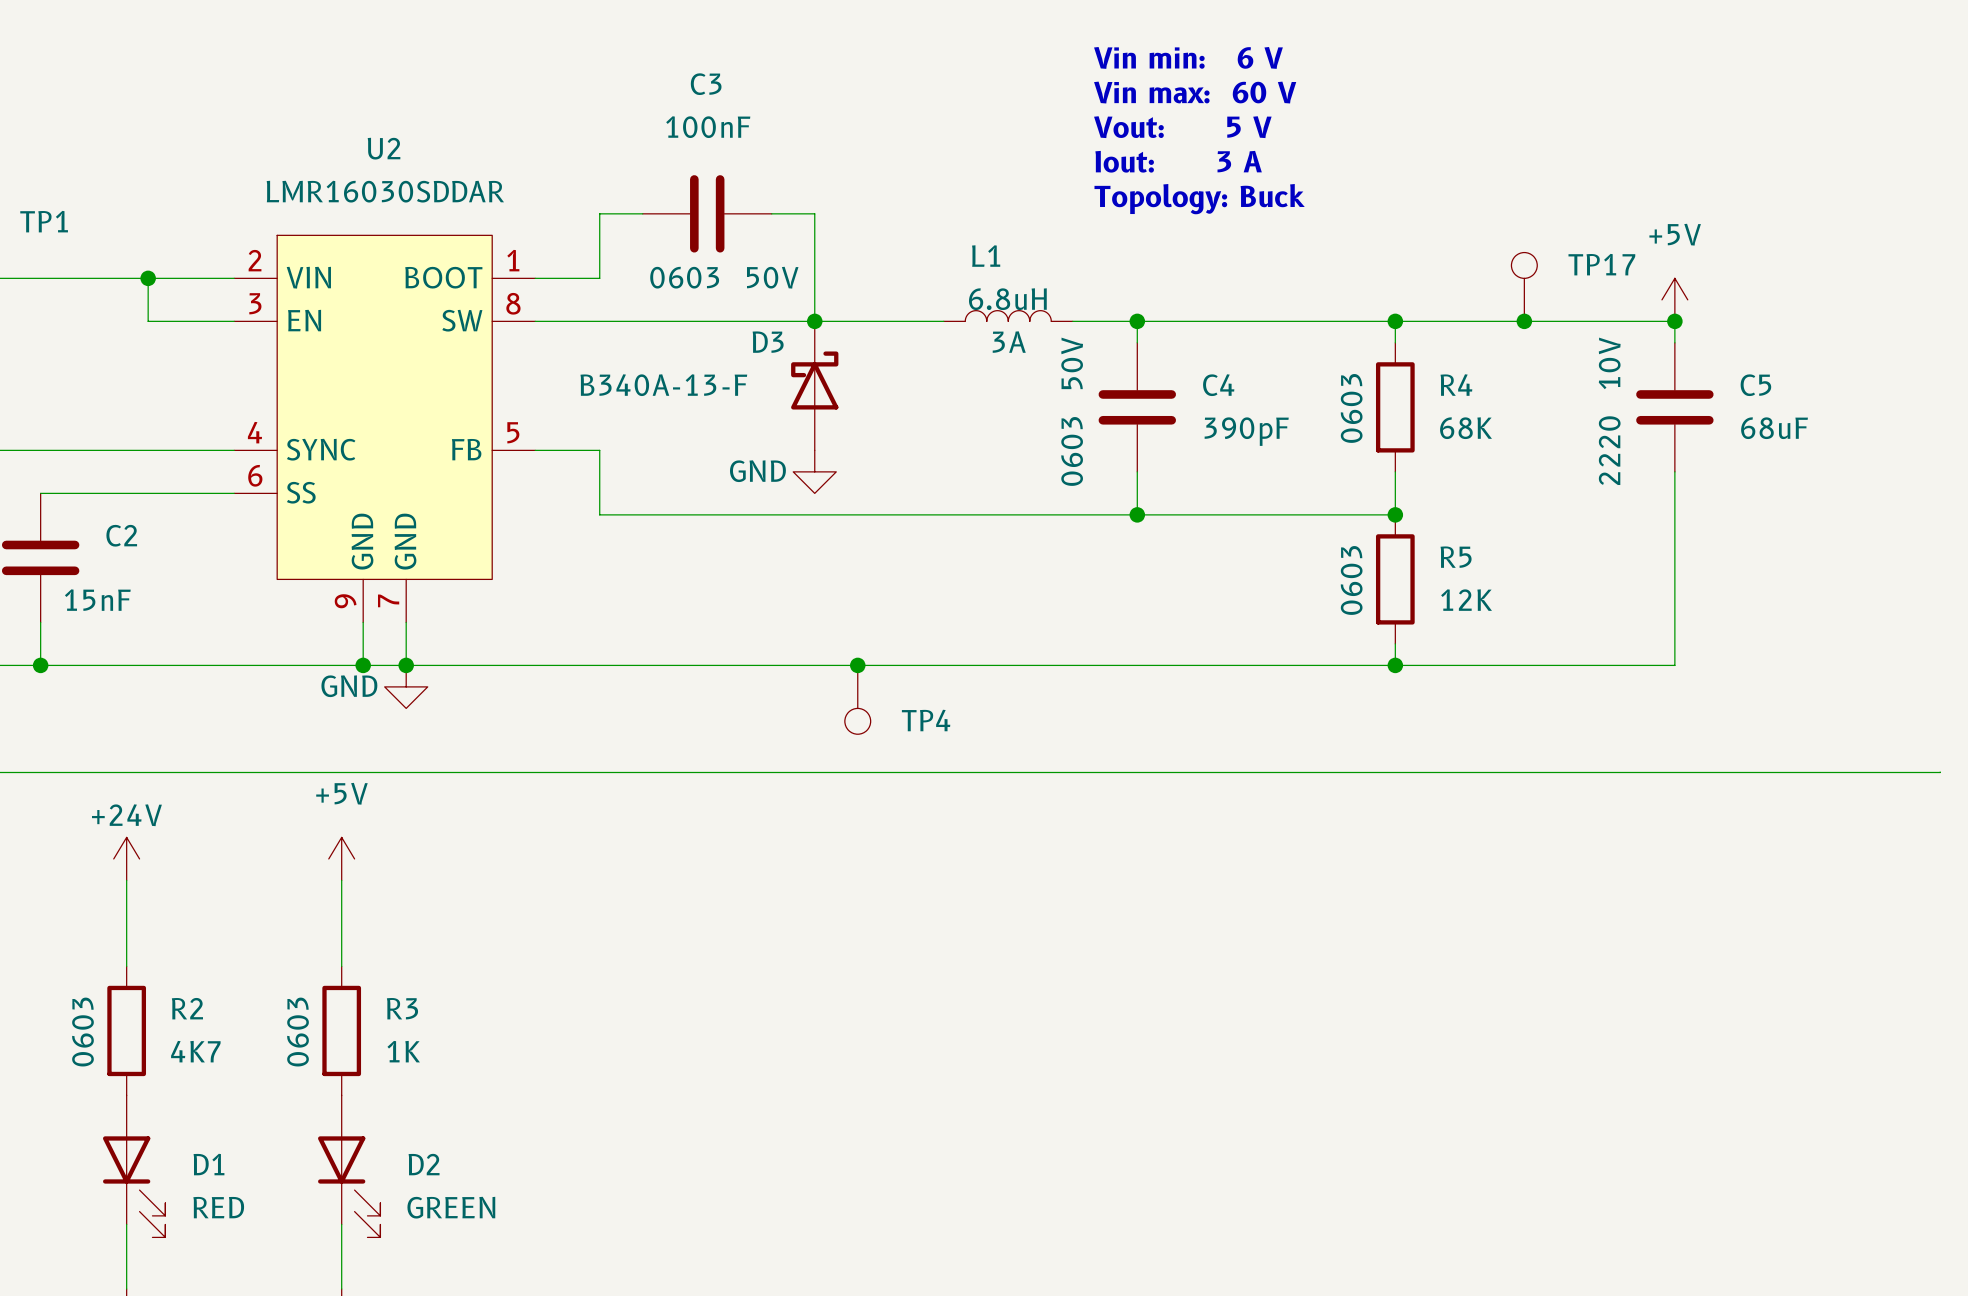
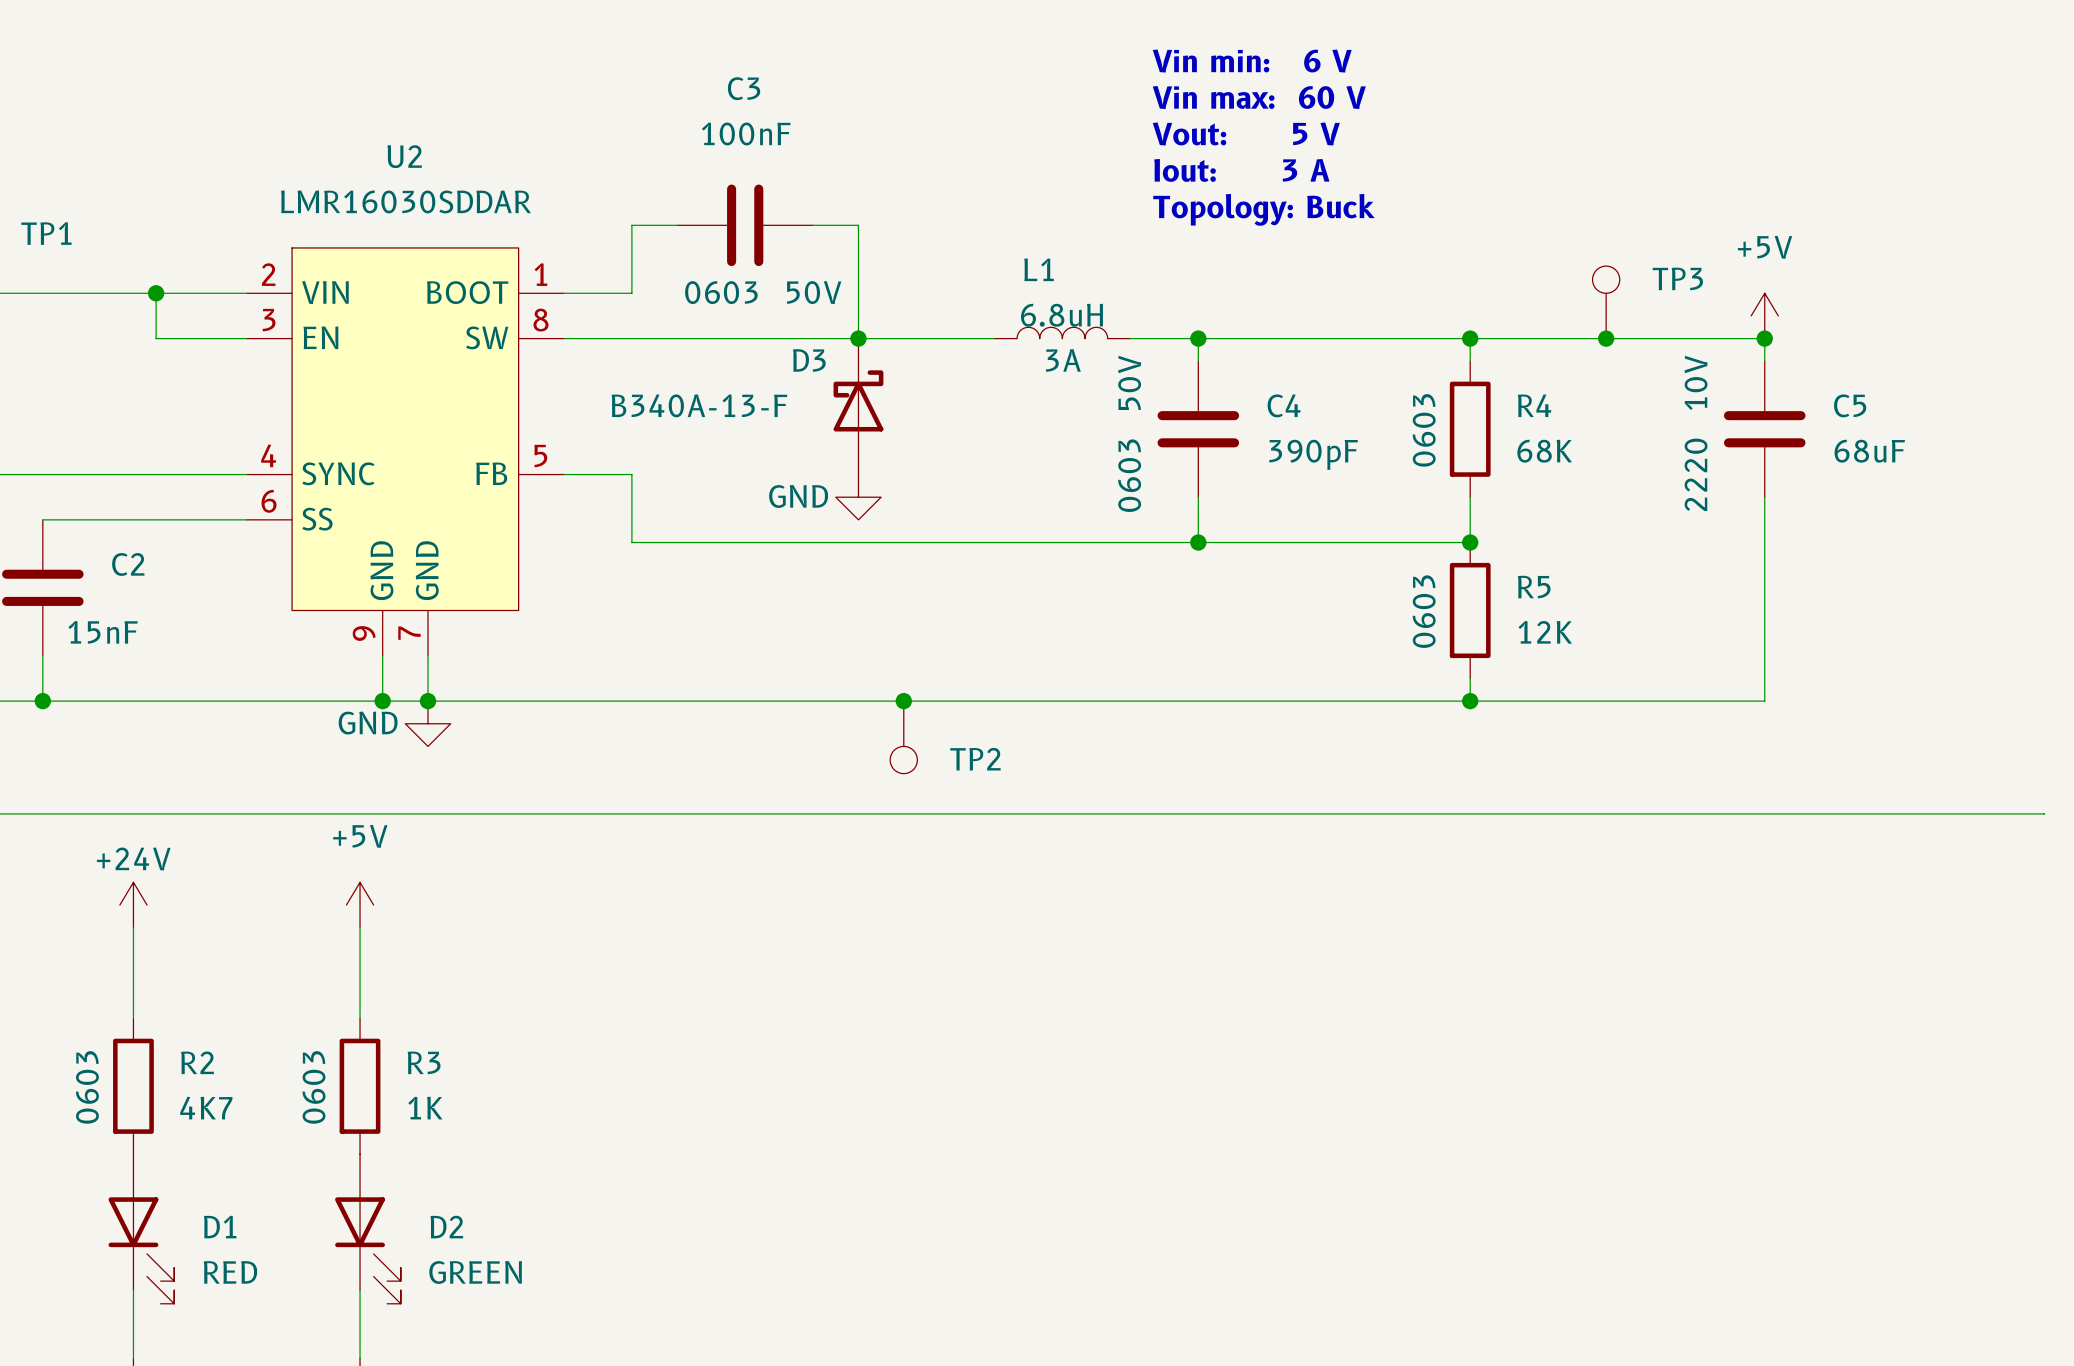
TP17 name: TP17 (1601, 264) -> TP3 (1677, 278)
TP4 name: TP4 (926, 720) -> TP2 (975, 759)

